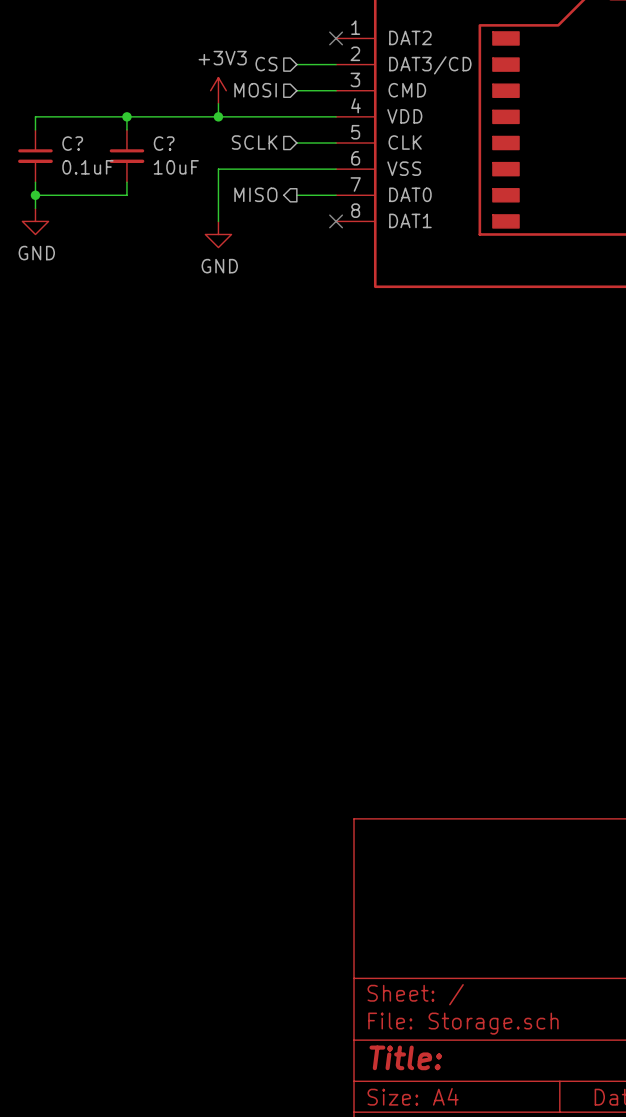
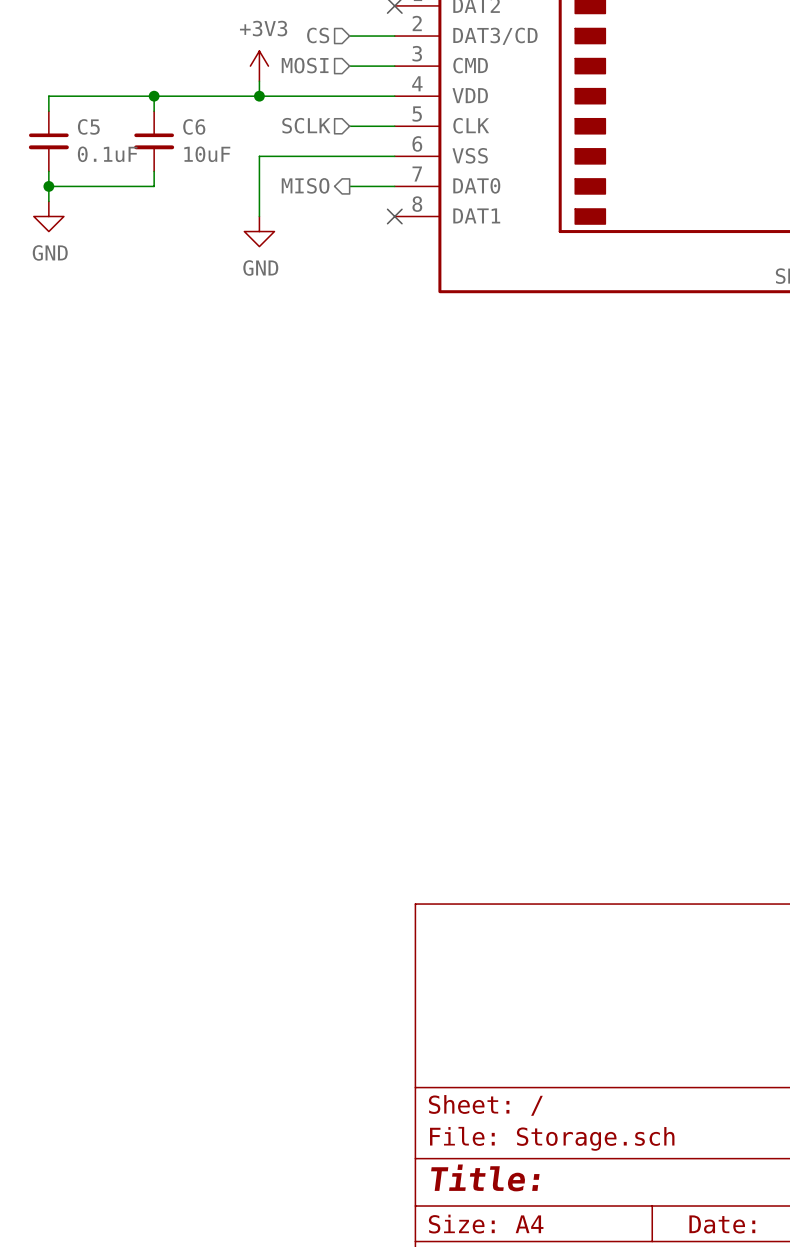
C? name: C? (72, 143) -> C5 (88, 126)
C? name: C? (164, 143) -> C6 (194, 126)

